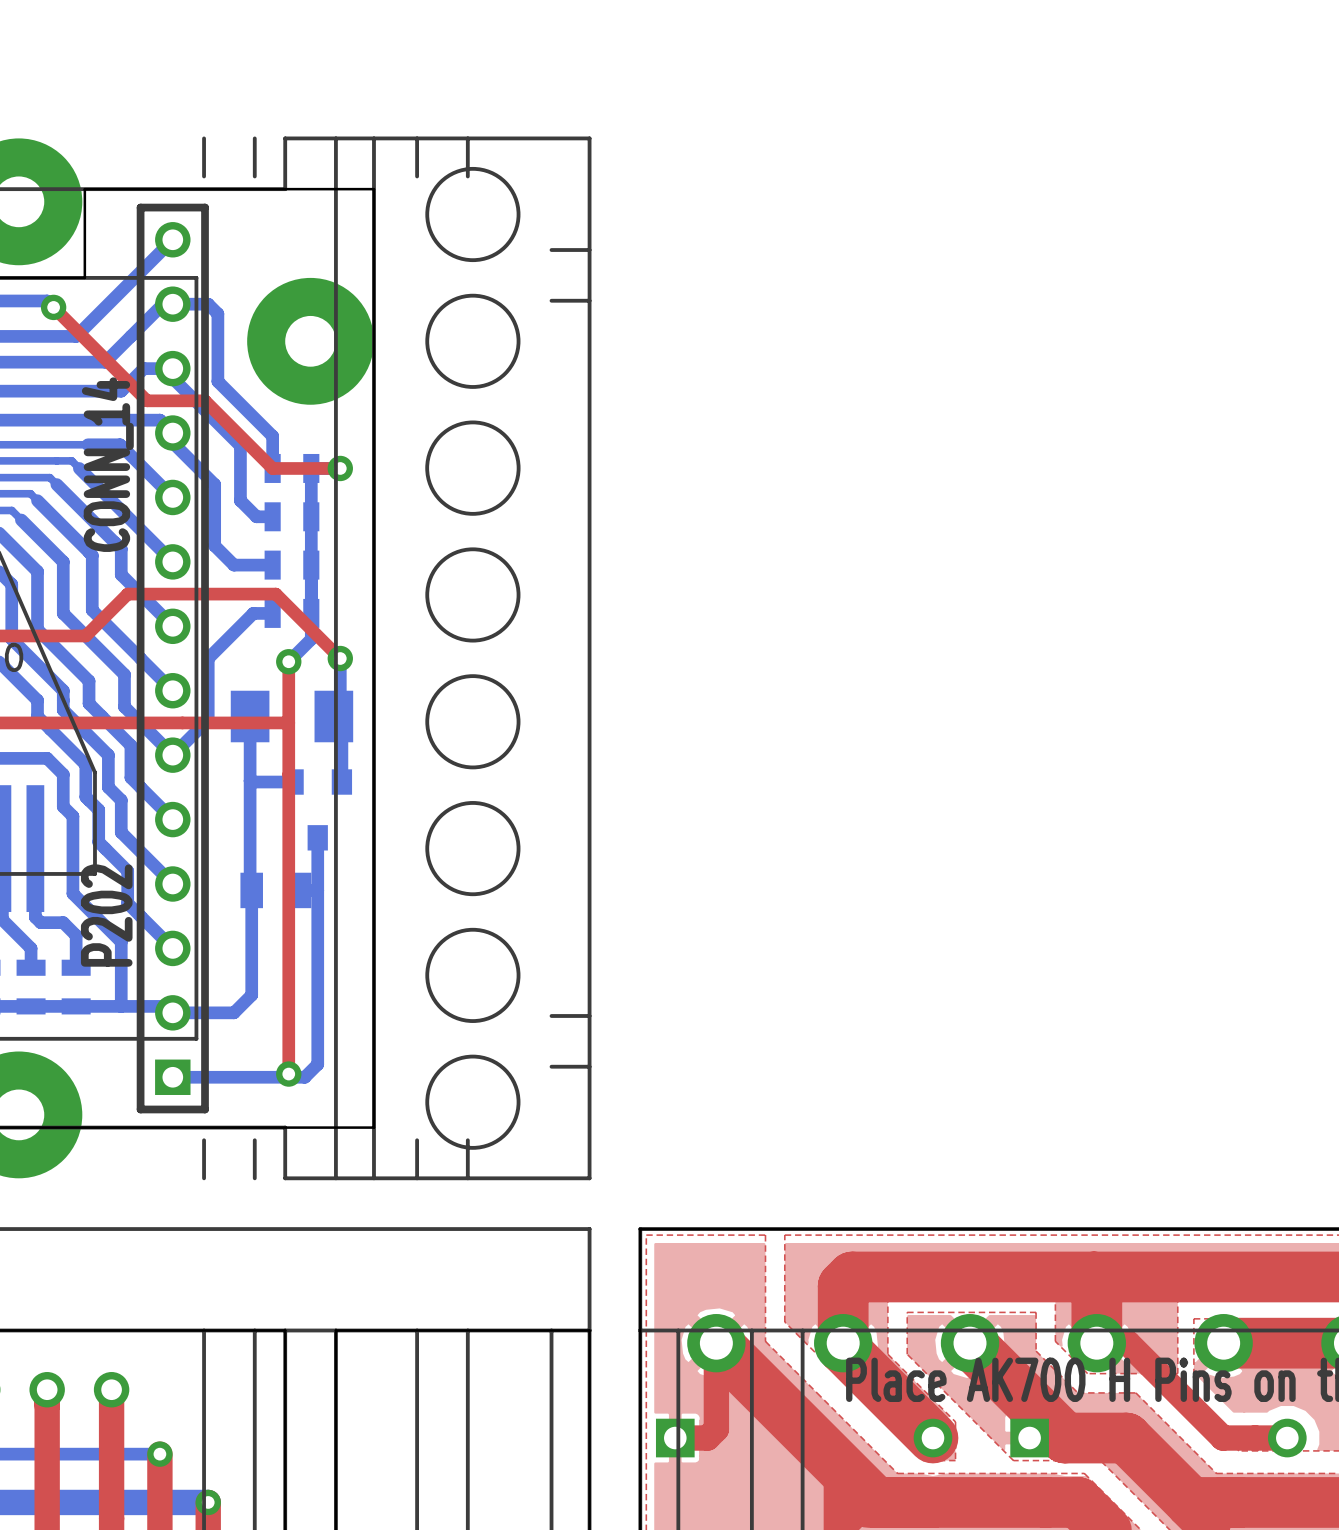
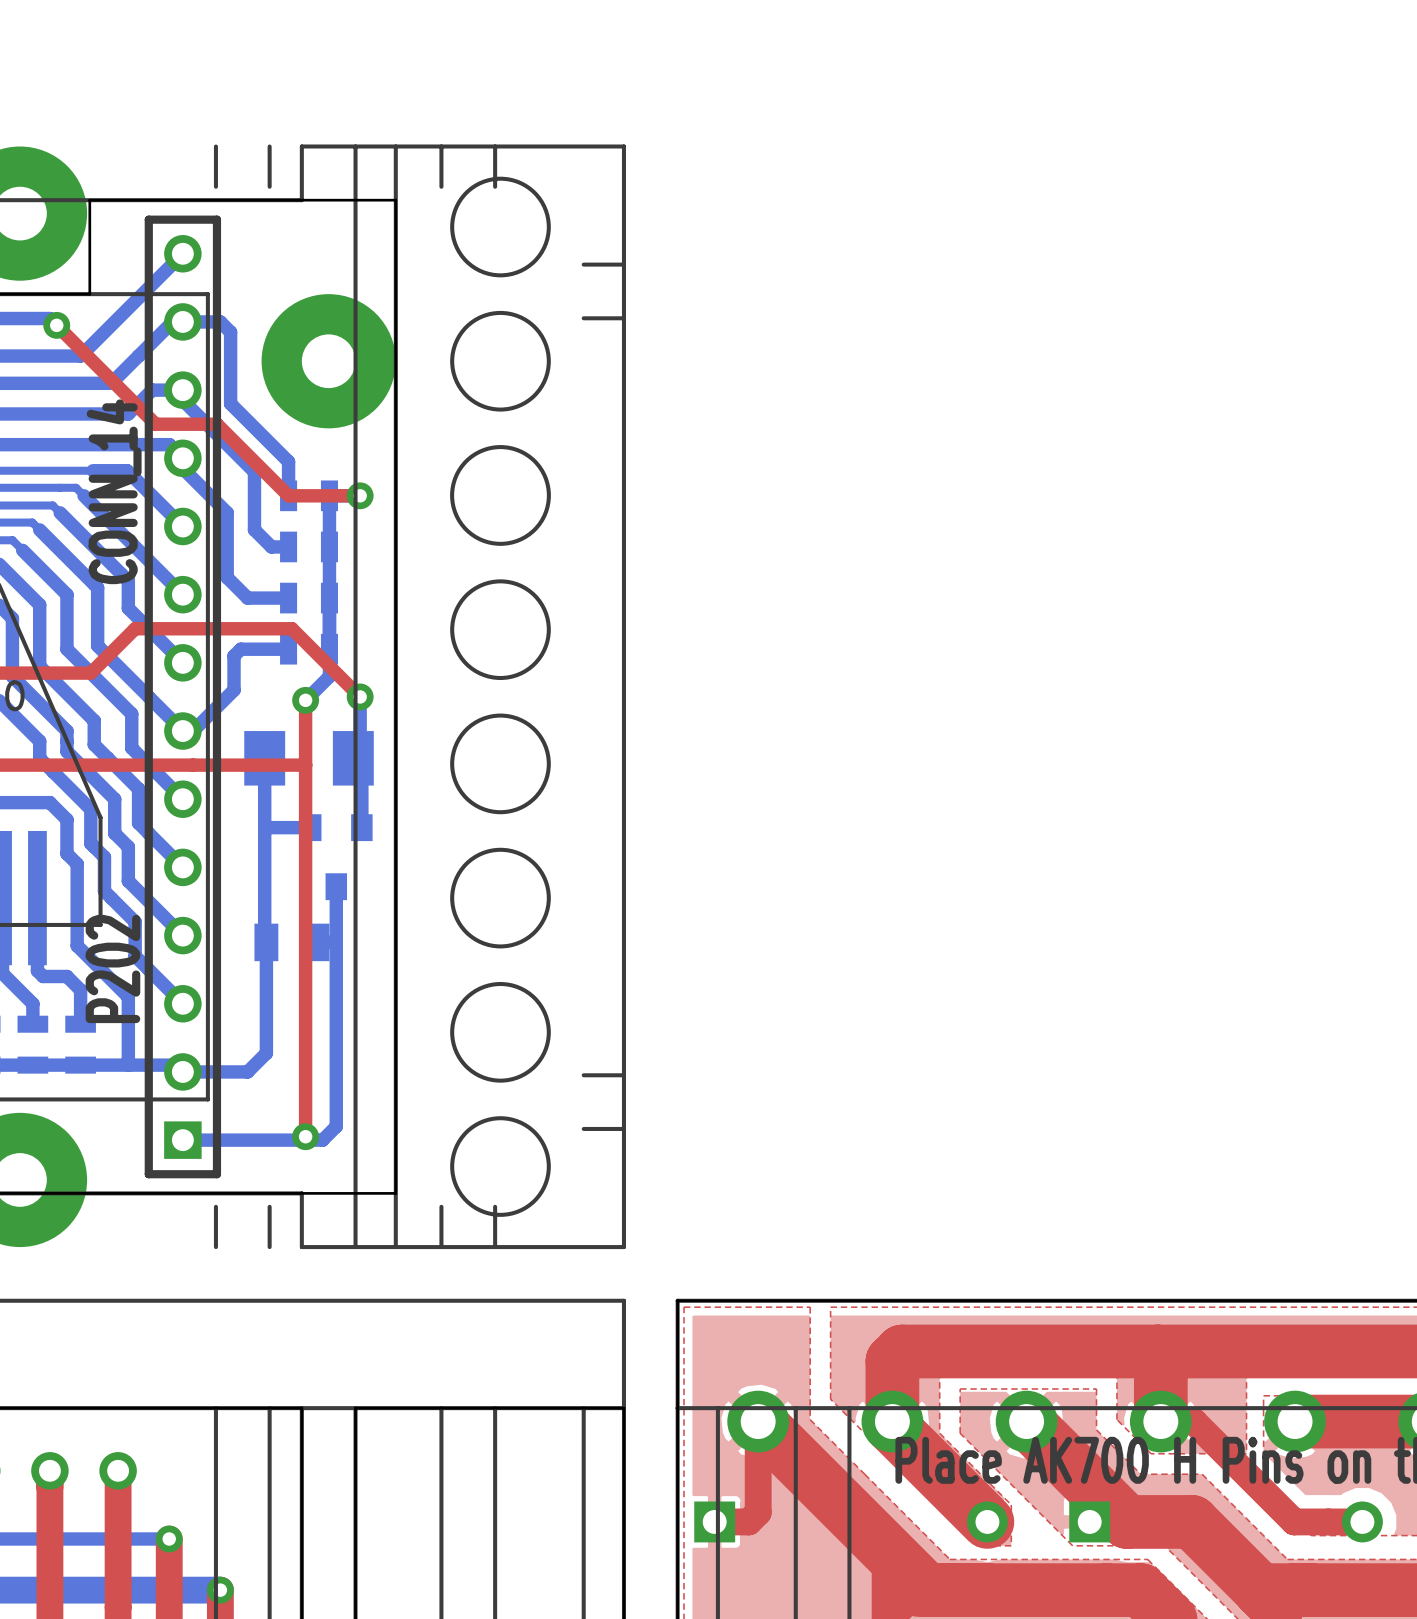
bottom track: (253, 613) (208, 658) (208, 719) (172, 755) -> (268, 649) (240, 649) (234, 656) (234, 690) (193, 731) (182, 731)

